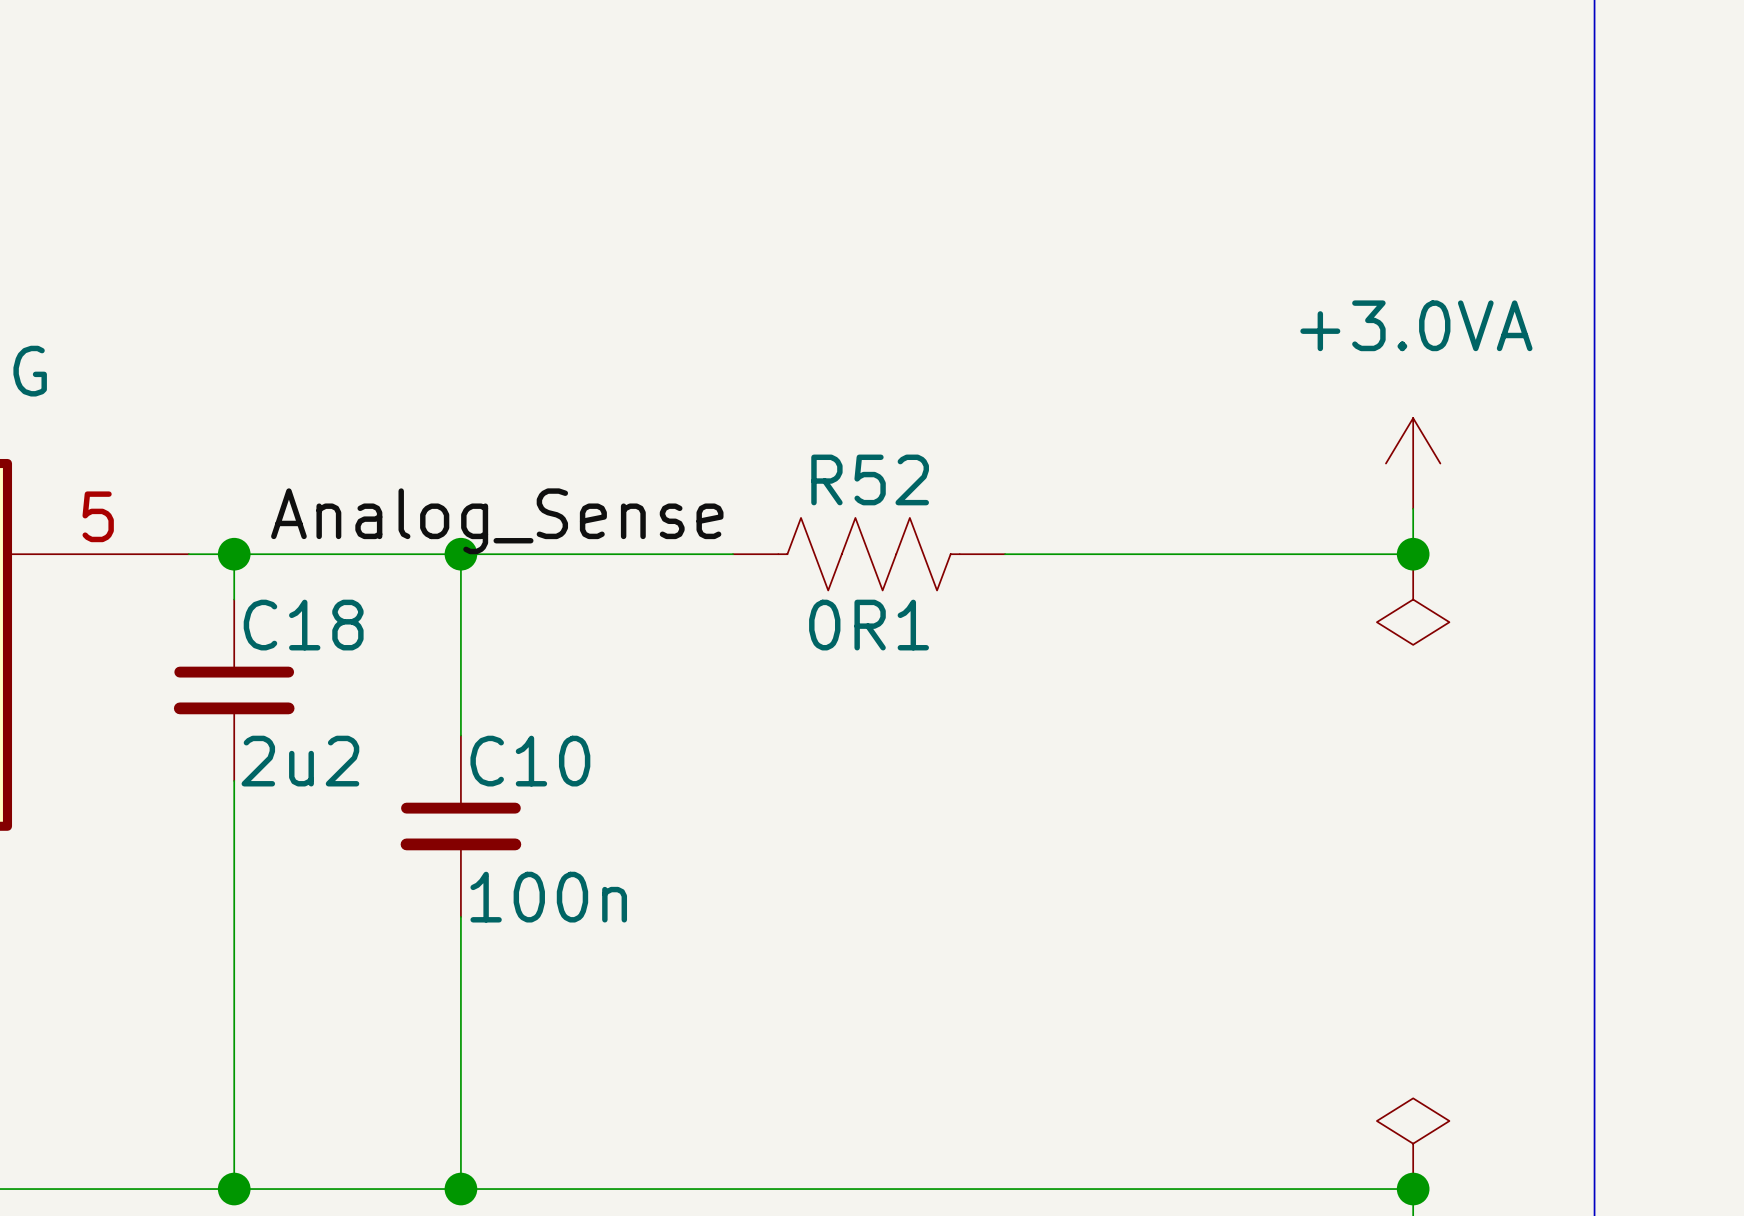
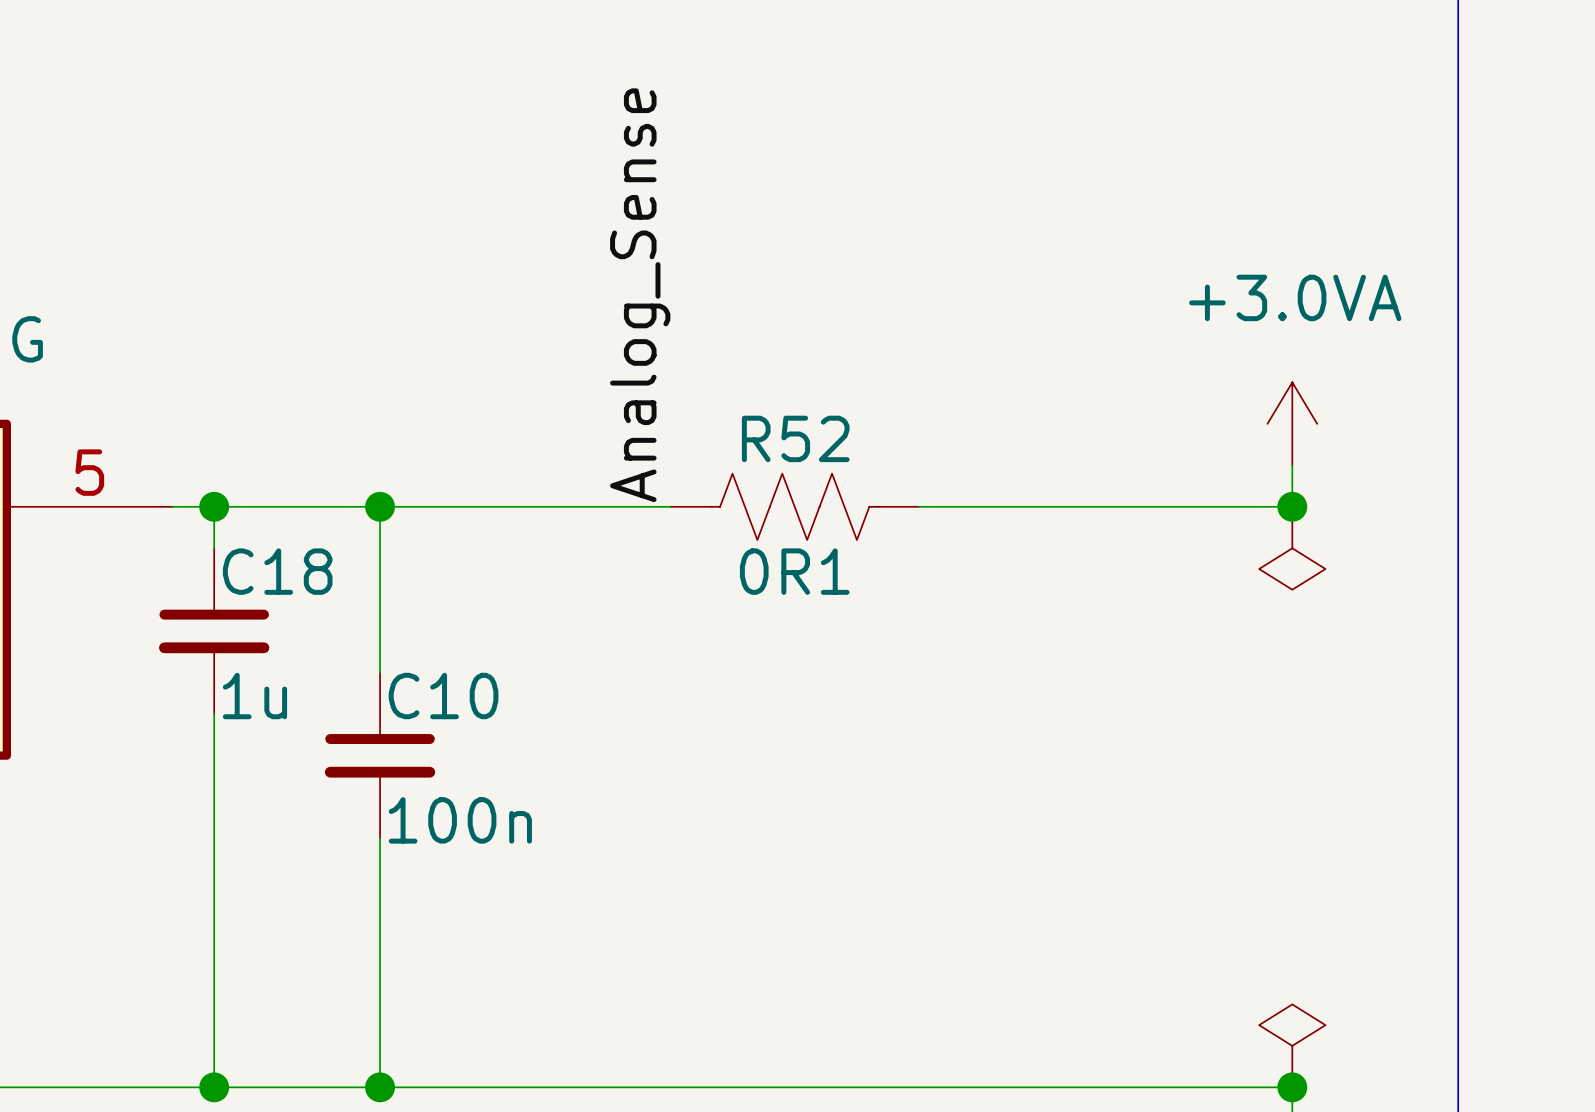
label rotation: 0° (497, 521) -> 90° counterclockwise (640, 295)
wire: (460, 554) (460, 735) -> (380, 506) (380, 672)
junction position: (460, 554) -> (380, 506)
C18 value: 2u2 (300, 761) -> 1u (254, 696)
C10 position: (460, 826) -> (380, 755)
wire: (460, 916) (460, 1189) -> (380, 838) (380, 1087)
junction position: (460, 1189) -> (380, 1087)

